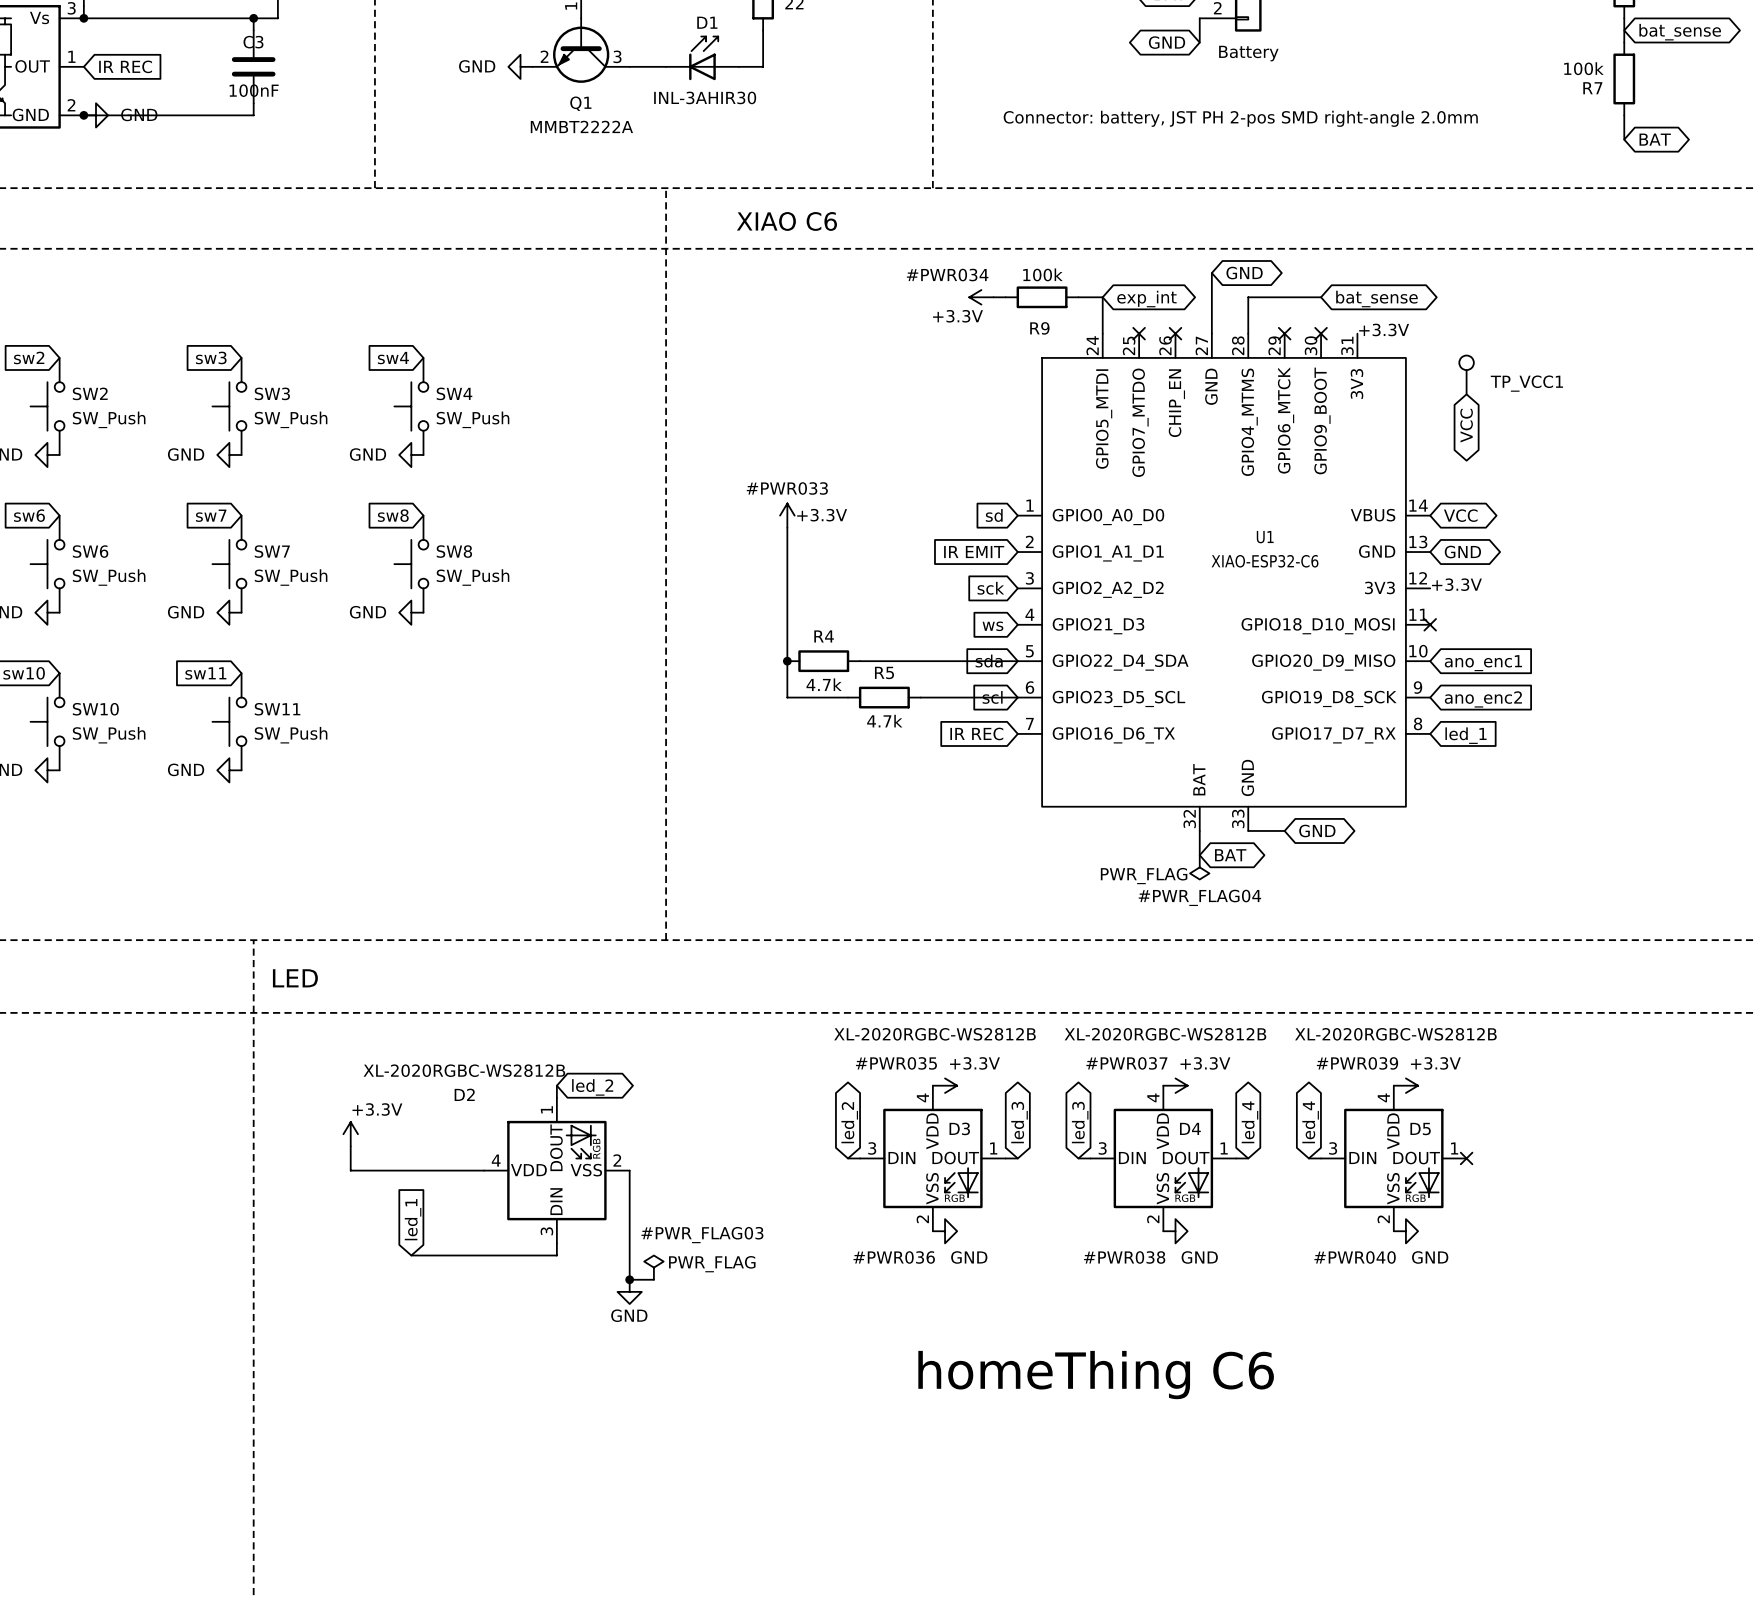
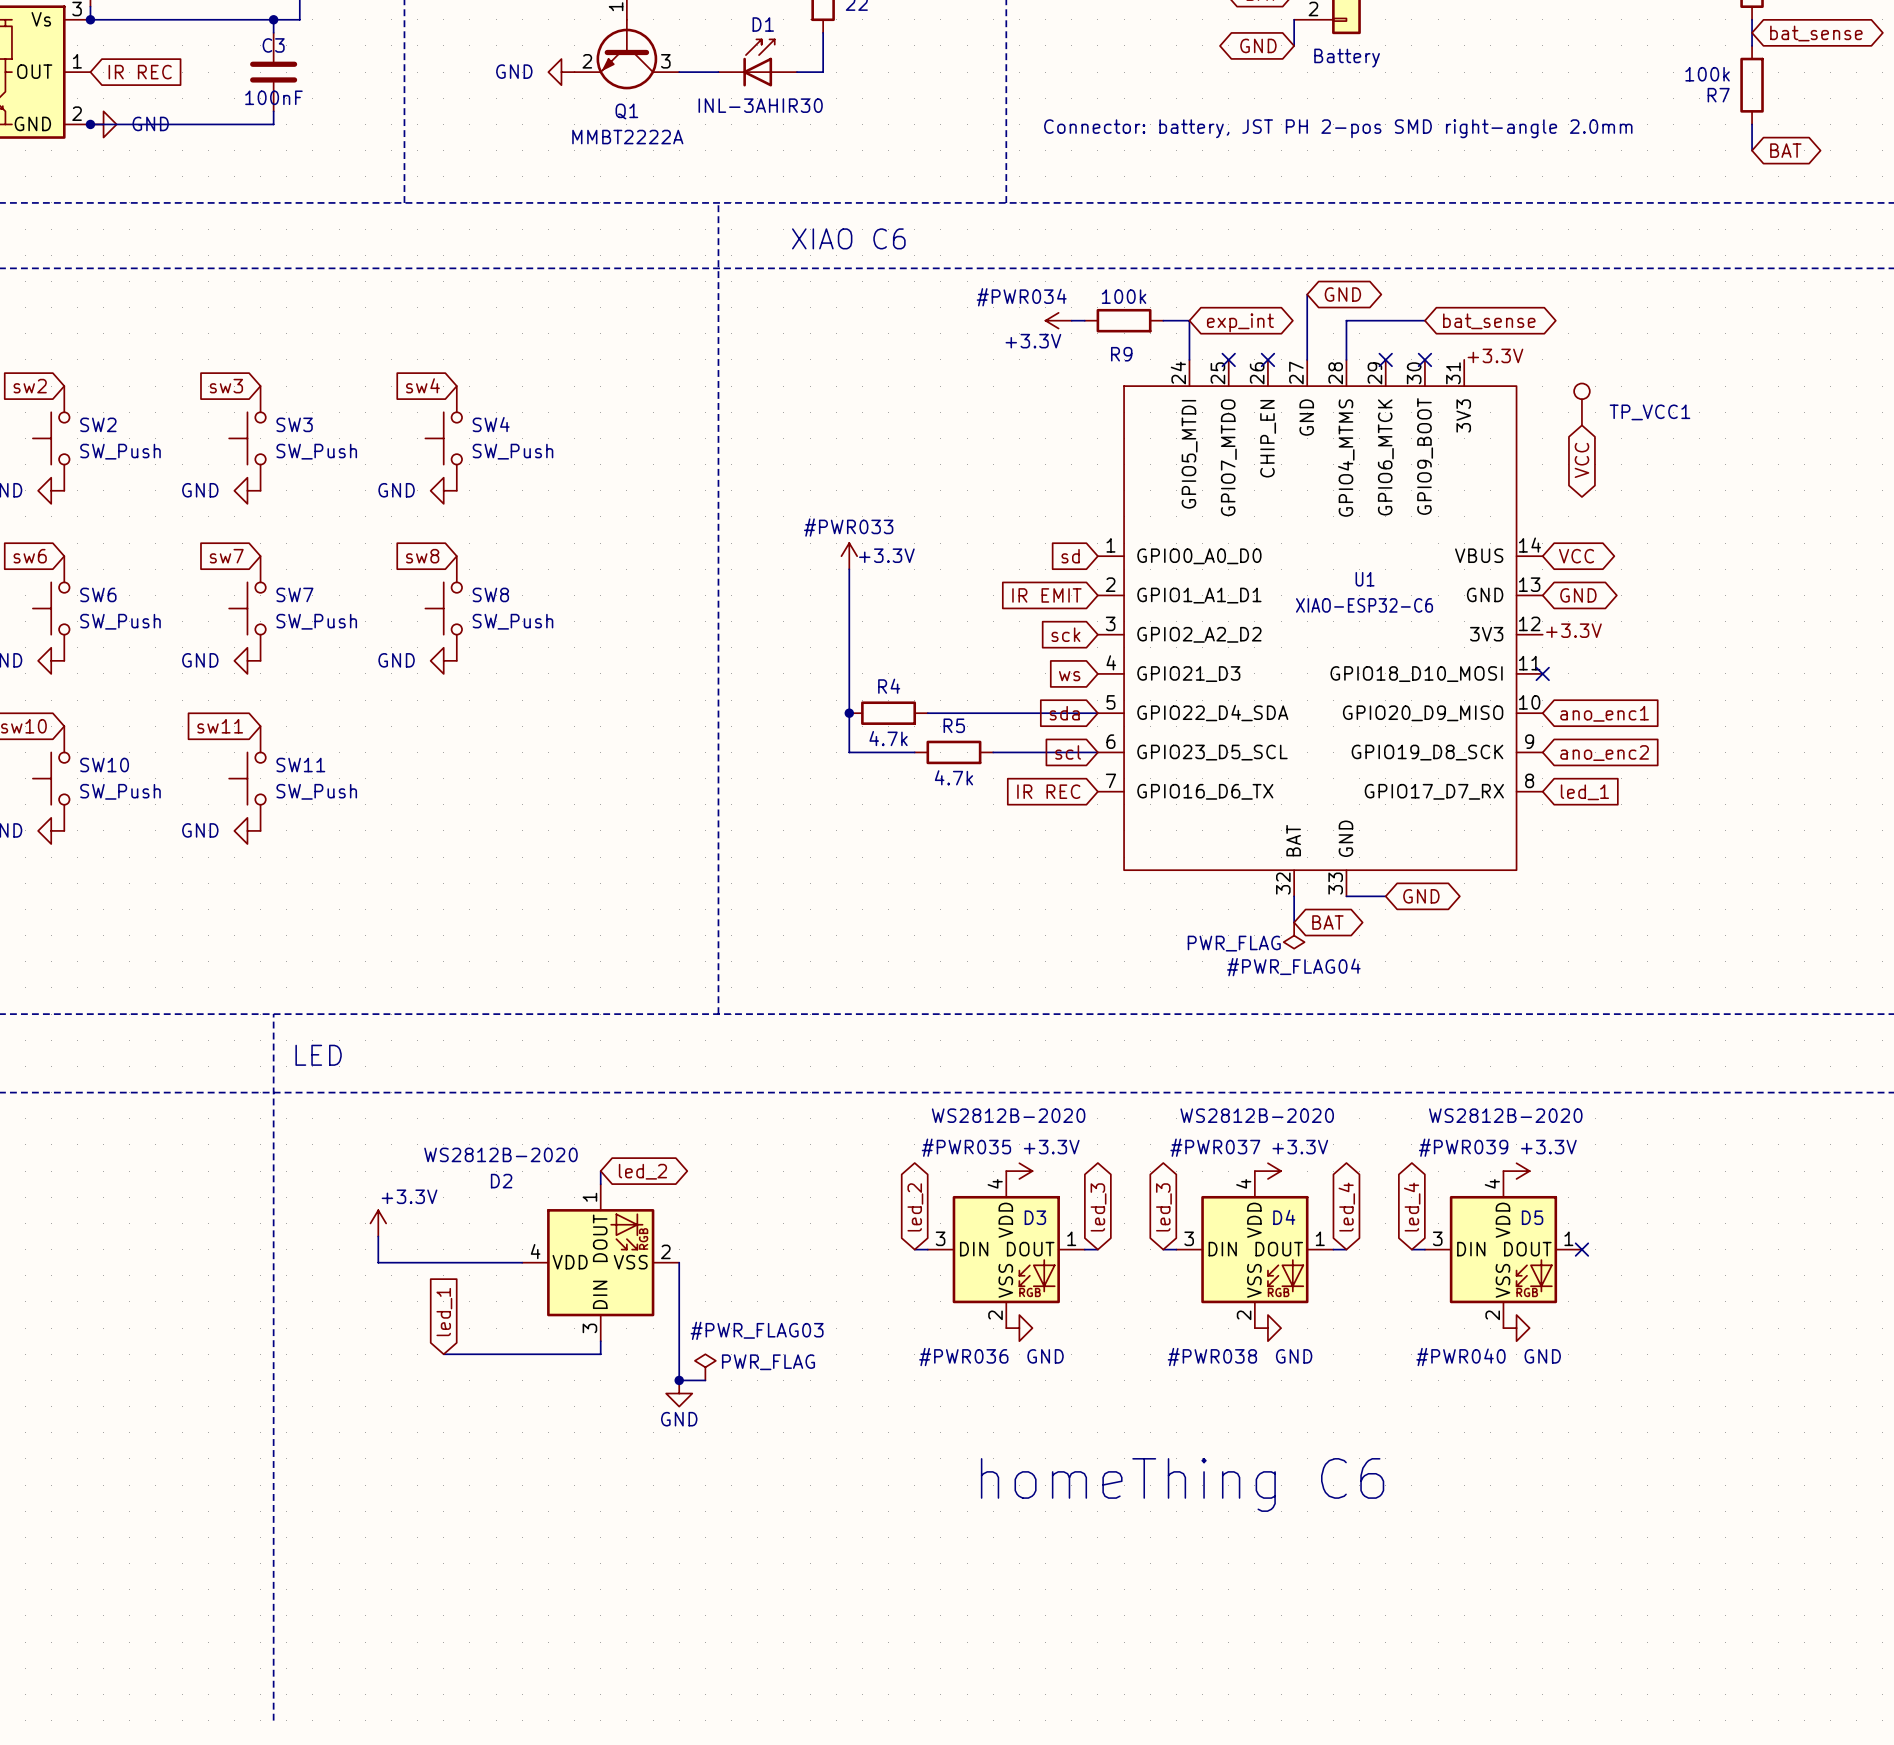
D3 value: XL-2020RGBC-WS2812B (934, 1034) -> WS2812B-2020 (1008, 1115)
D4 value: XL-2020RGBC-WS2812B (1165, 1034) -> WS2812B-2020 (1257, 1115)
D5 value: XL-2020RGBC-WS2812B (1395, 1034) -> WS2812B-2020 (1505, 1115)
D2 value: XL-2020RGBC-WS2812B (464, 1070) -> WS2812B-2020 (500, 1154)

